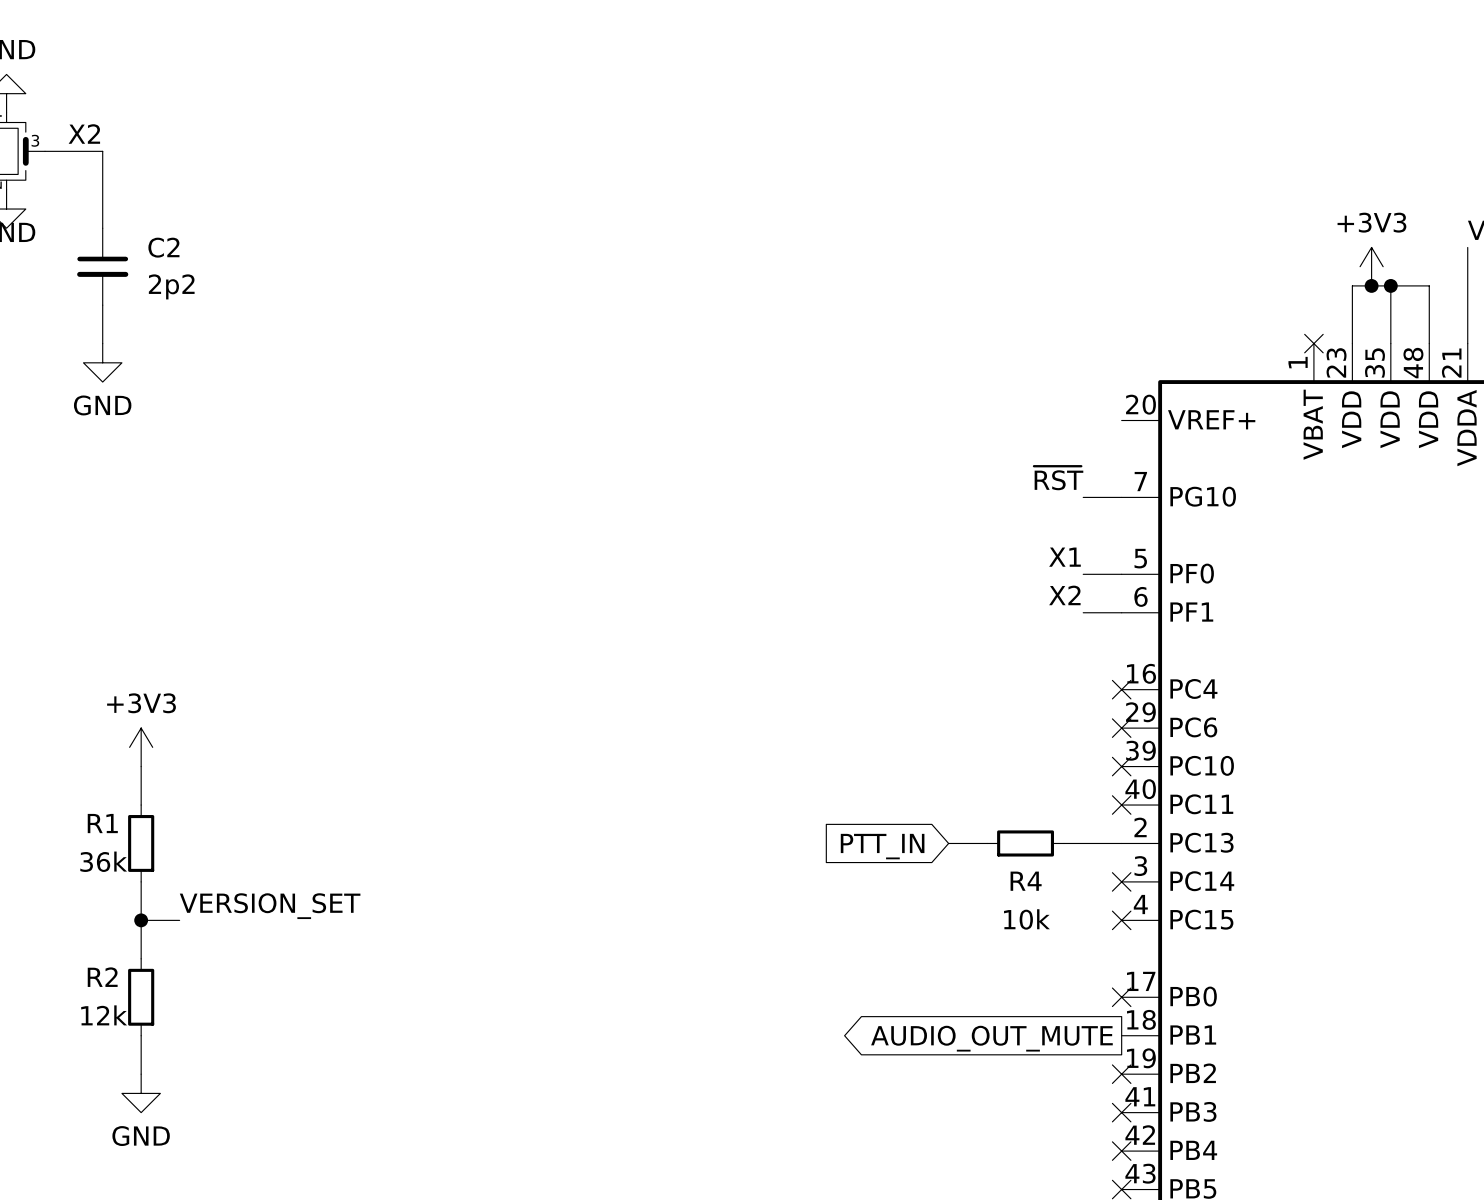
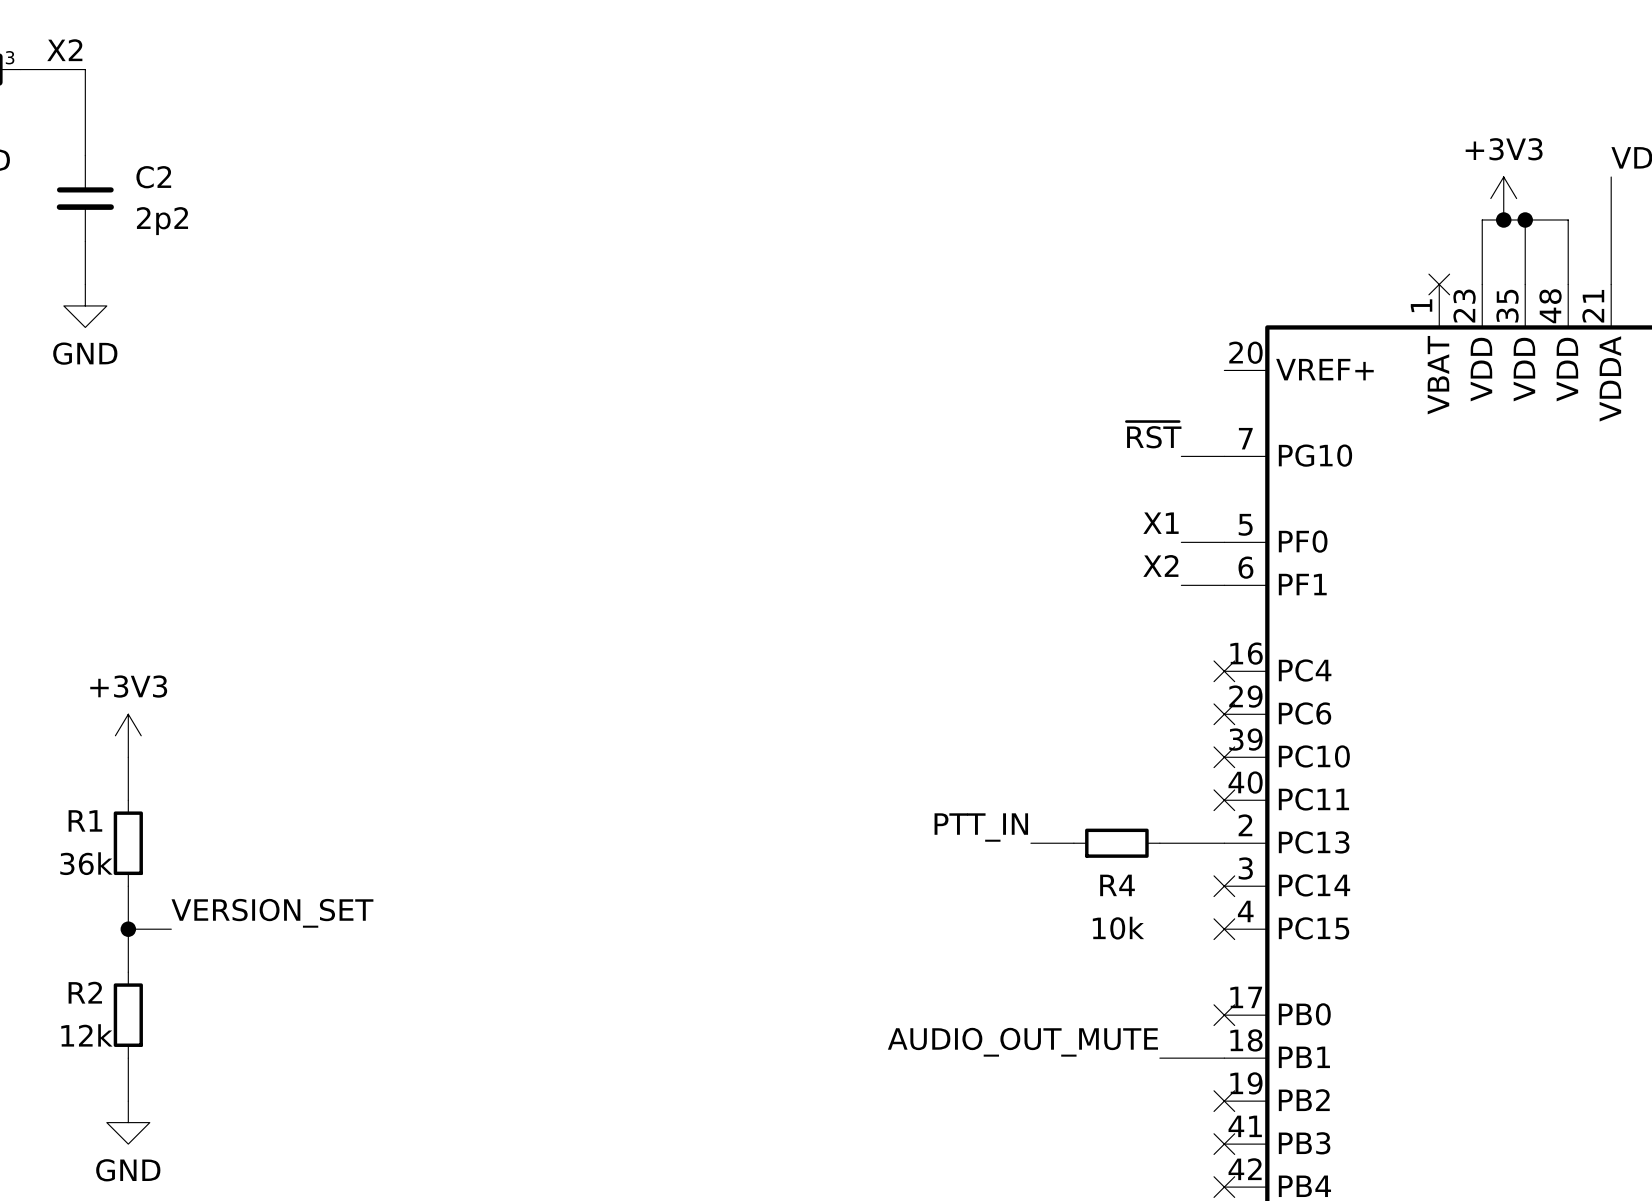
label: none -> PTT_IN (981, 827)
global label: PTT_IN (882, 846) -> none
label: none -> AUDIO_OUT_MUTE (1022, 1042)
wire: none -> (1159, 1058) (1224, 1058)
global label: AUDIO_OUT_MUTE (991, 1038) -> none

